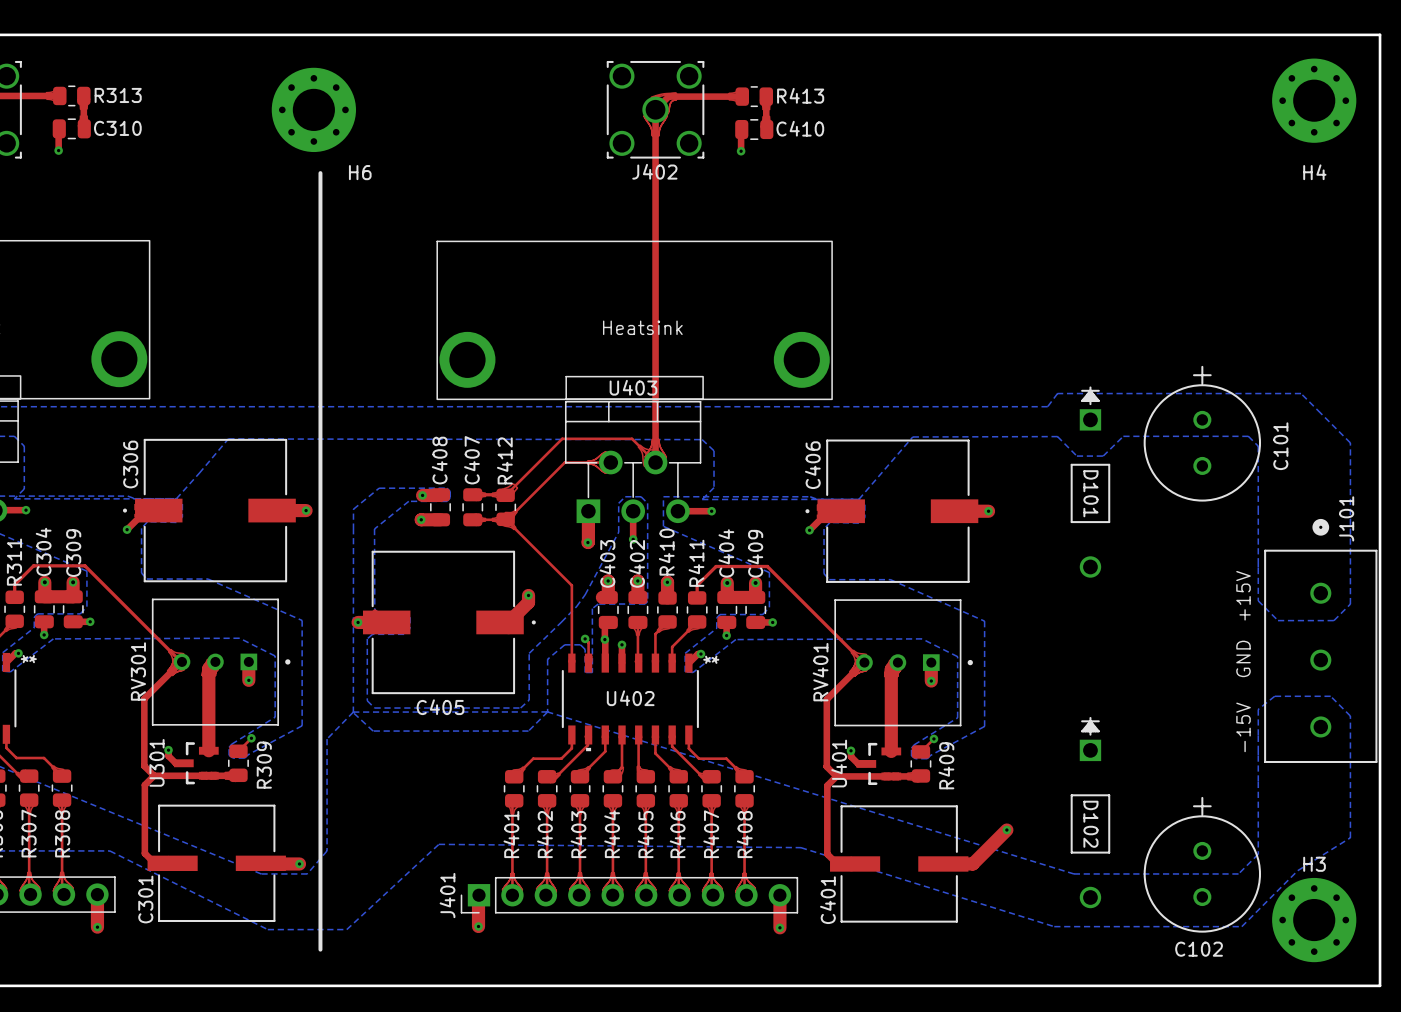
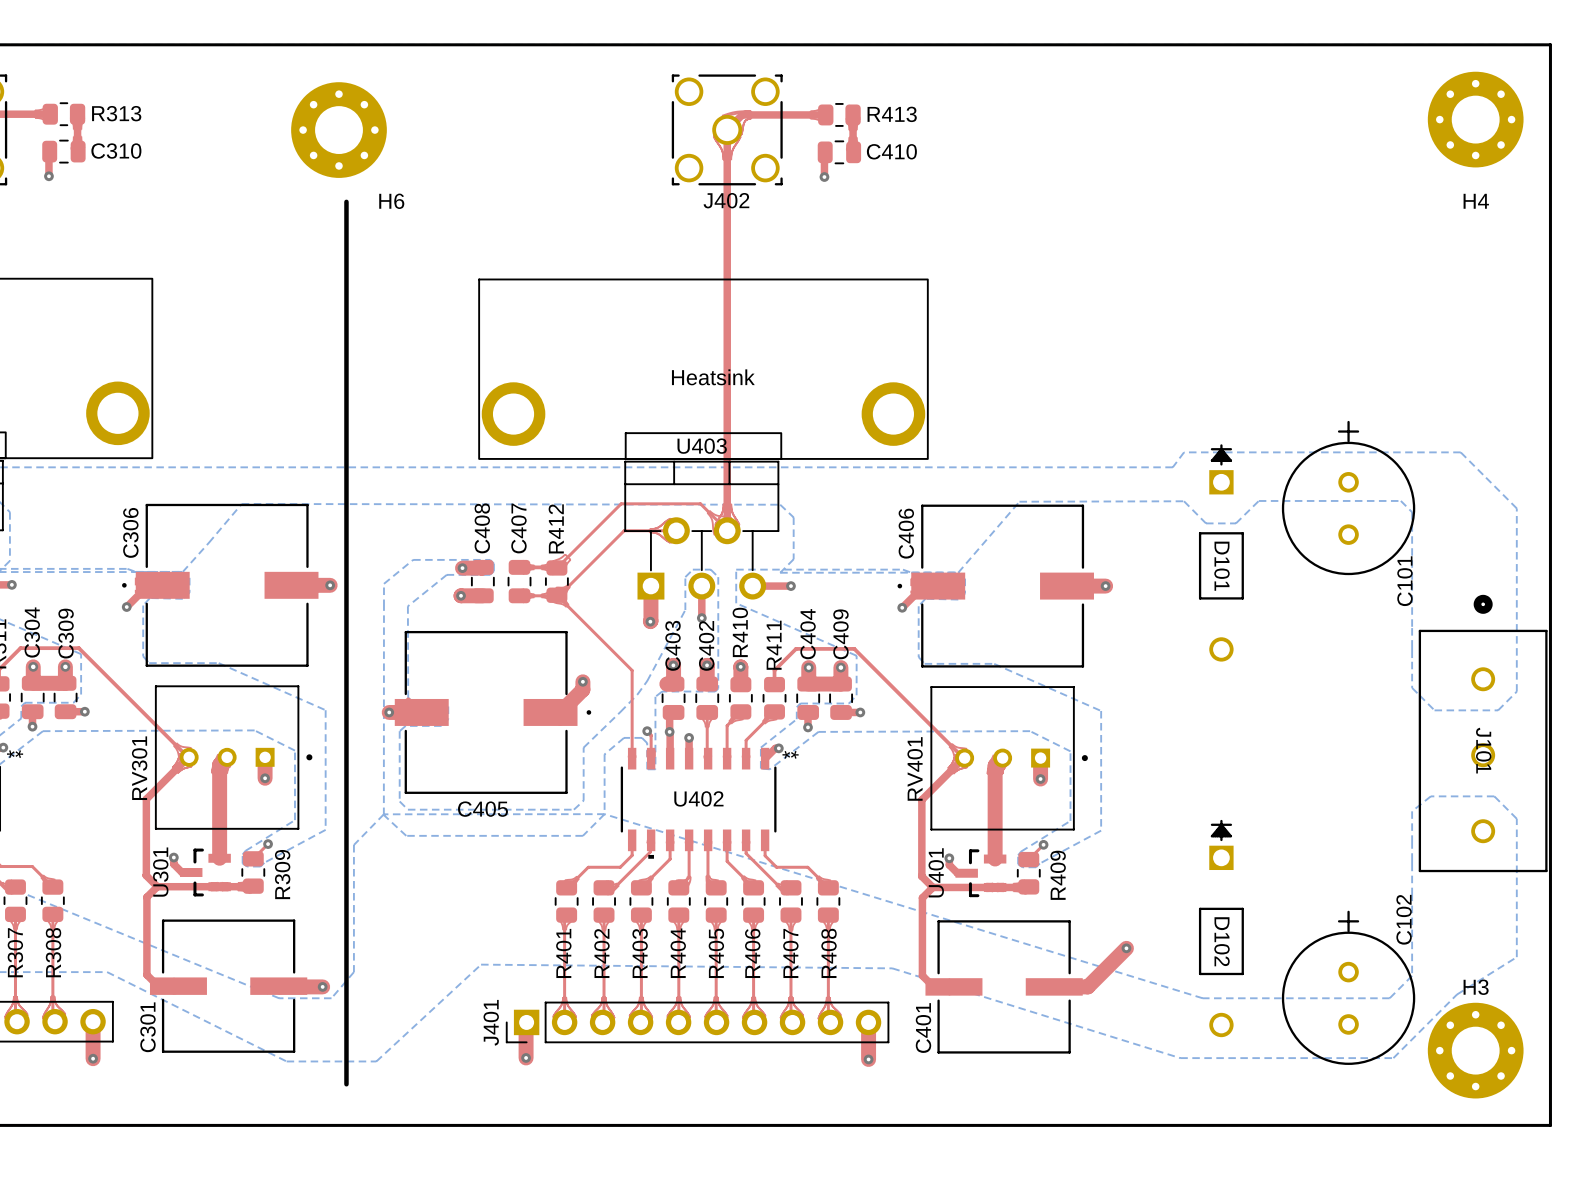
C101 name position: C101 (1280, 446) -> C101 (1404, 581)
J101 name rotation: 0° (1346, 518) -> 180° (1483, 750)
J101 name position: J101 (1346, 518) -> J101 (1483, 750)
text: +15V (1243, 595) -> none
text: GND (1243, 658) -> none
text: -15V (1243, 727) -> none
C102 name rotation: 0° (1199, 949) -> 90° counterclockwise (1404, 919)
C102 name position: C102 (1199, 949) -> C102 (1404, 919)

